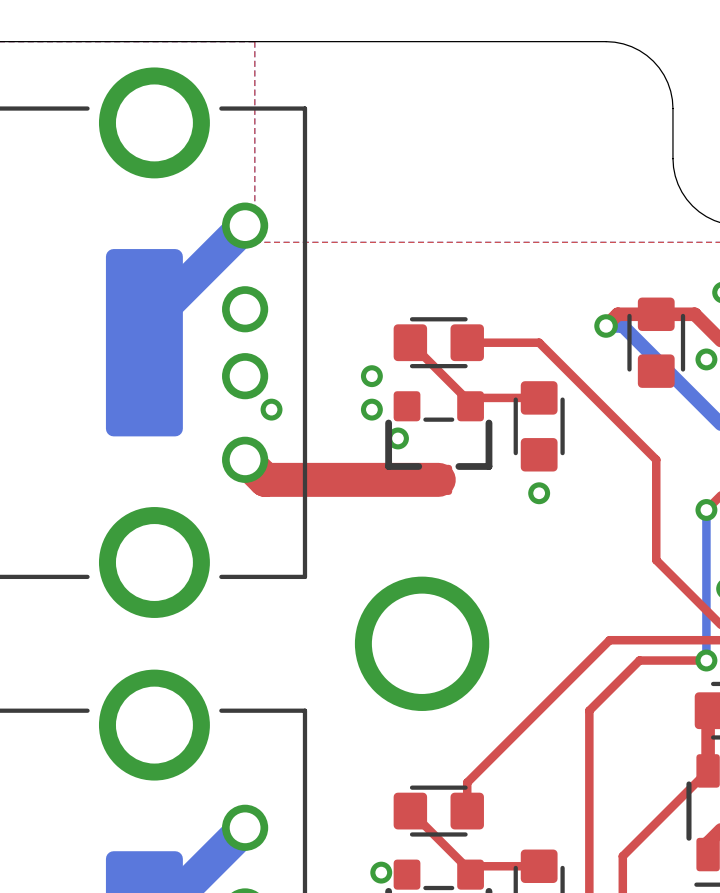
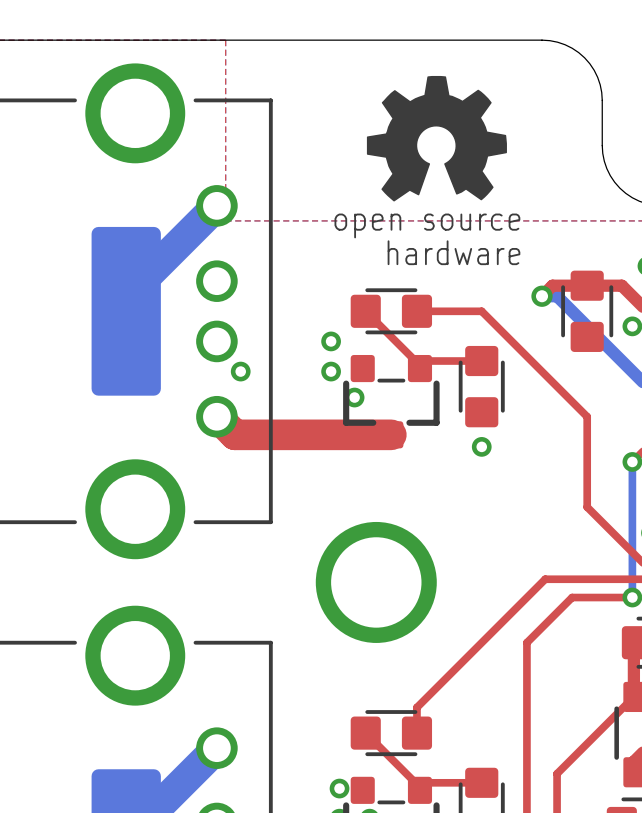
drawing: none -> [366, 75, 507, 202]

